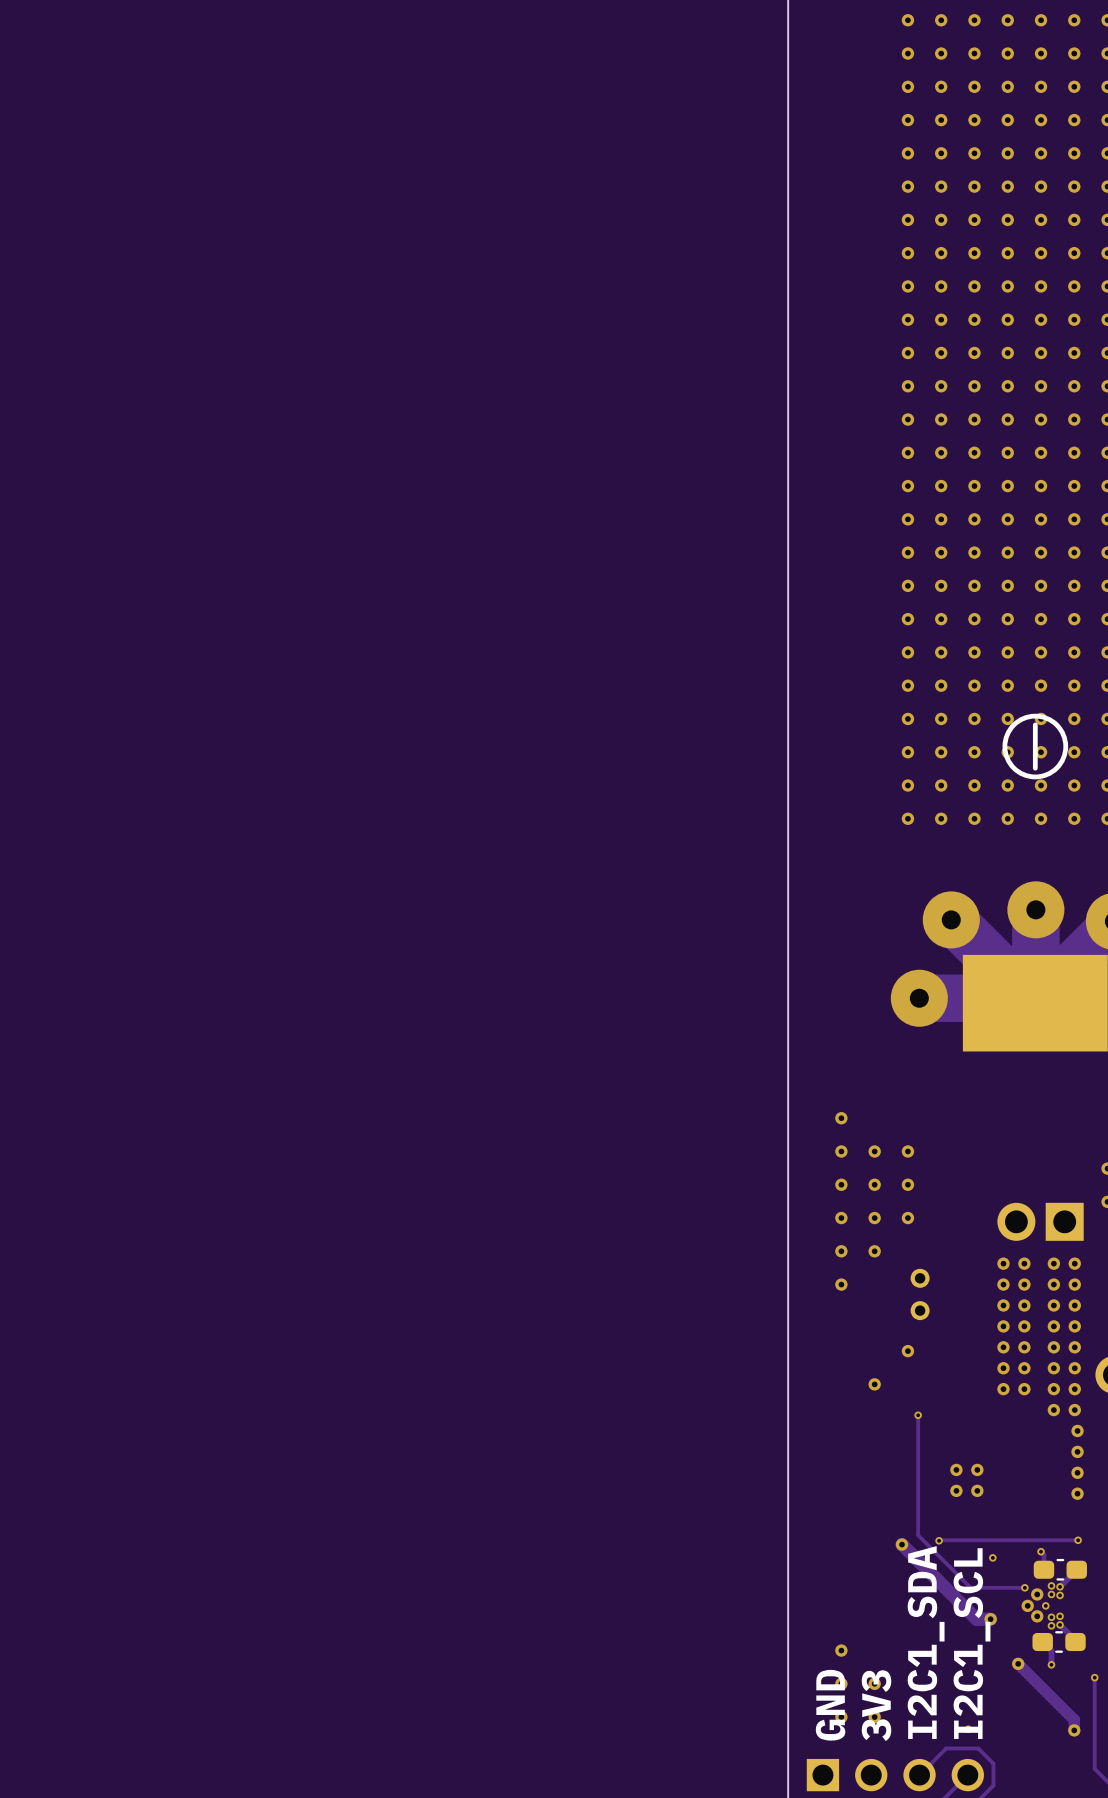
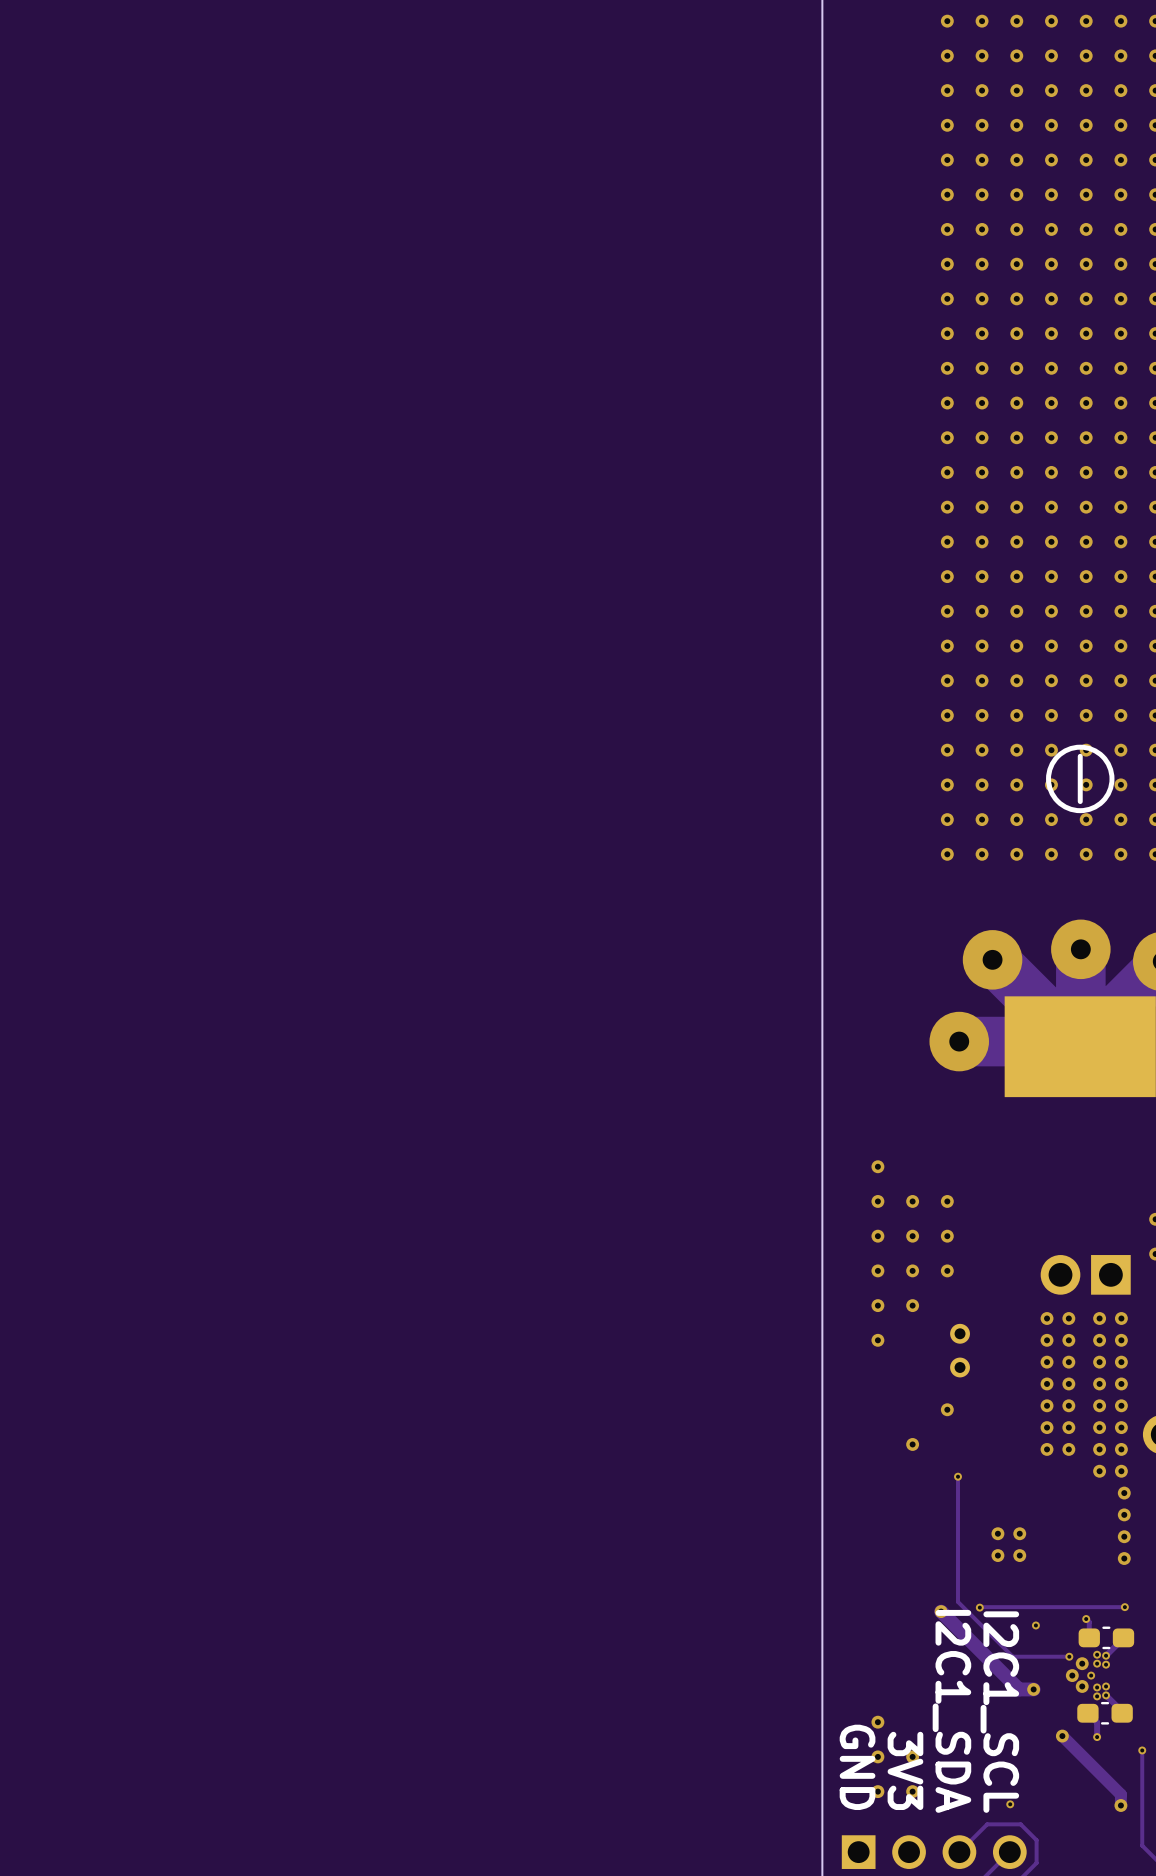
text: I2C1_SDA (926, 1642) -> I2C1_SCL (999, 1712)
text: I2C1_SCL (972, 1643) -> none
text: none -> GND (857, 1767)
text: GND (830, 1705) -> 3V3 (905, 1770)
text: 3V3 (876, 1705) -> I2C1_SDA (951, 1711)

